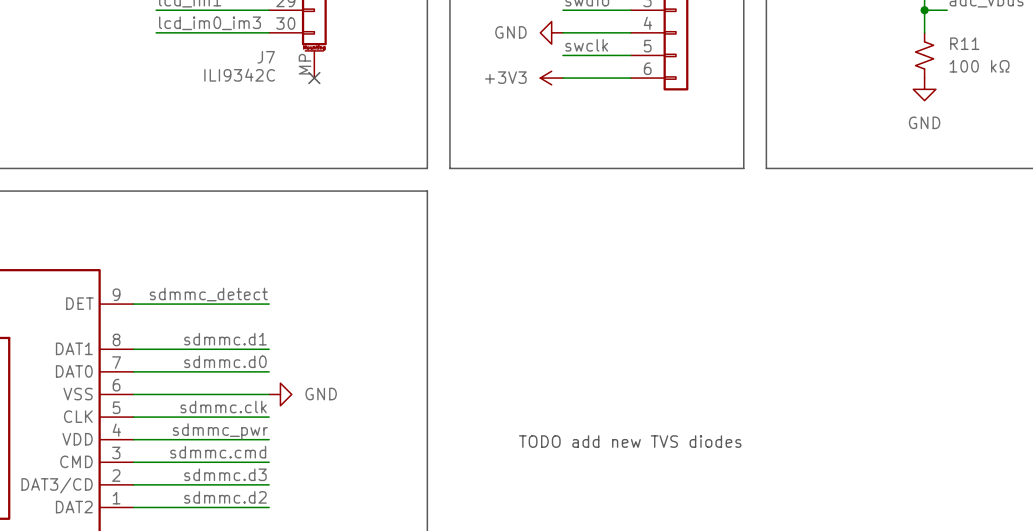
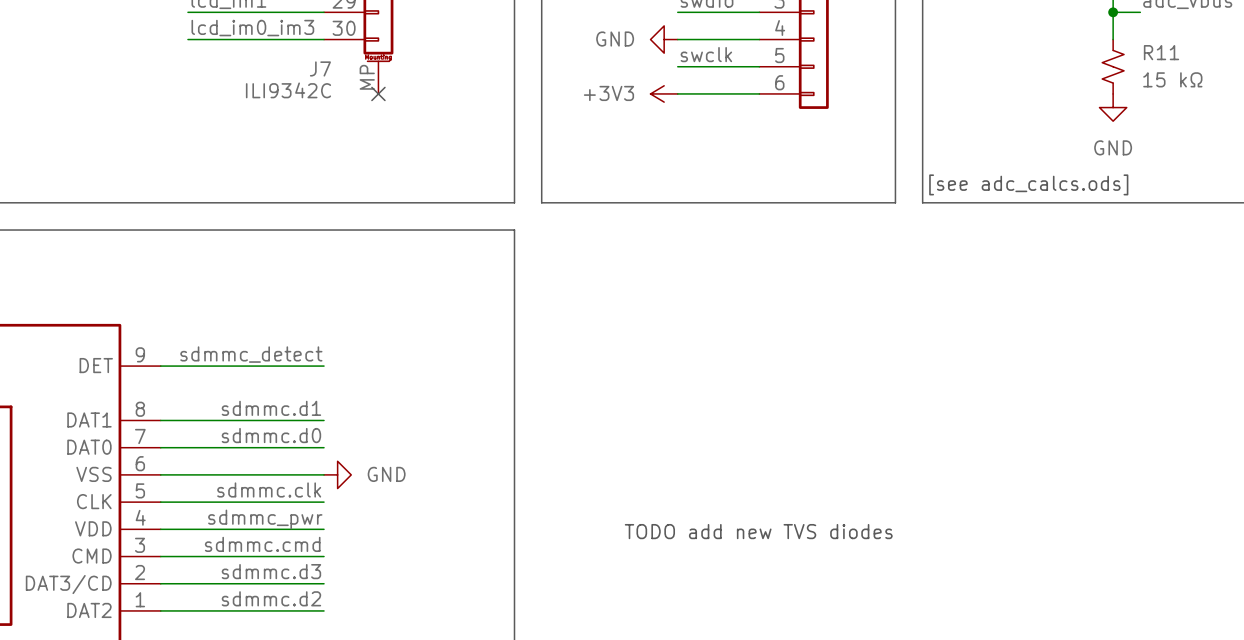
R11 value: 100 kΩ (979, 66) -> 15 kΩ (1172, 79)
text: none -> [see adc_calcs.ods] (1028, 184)

